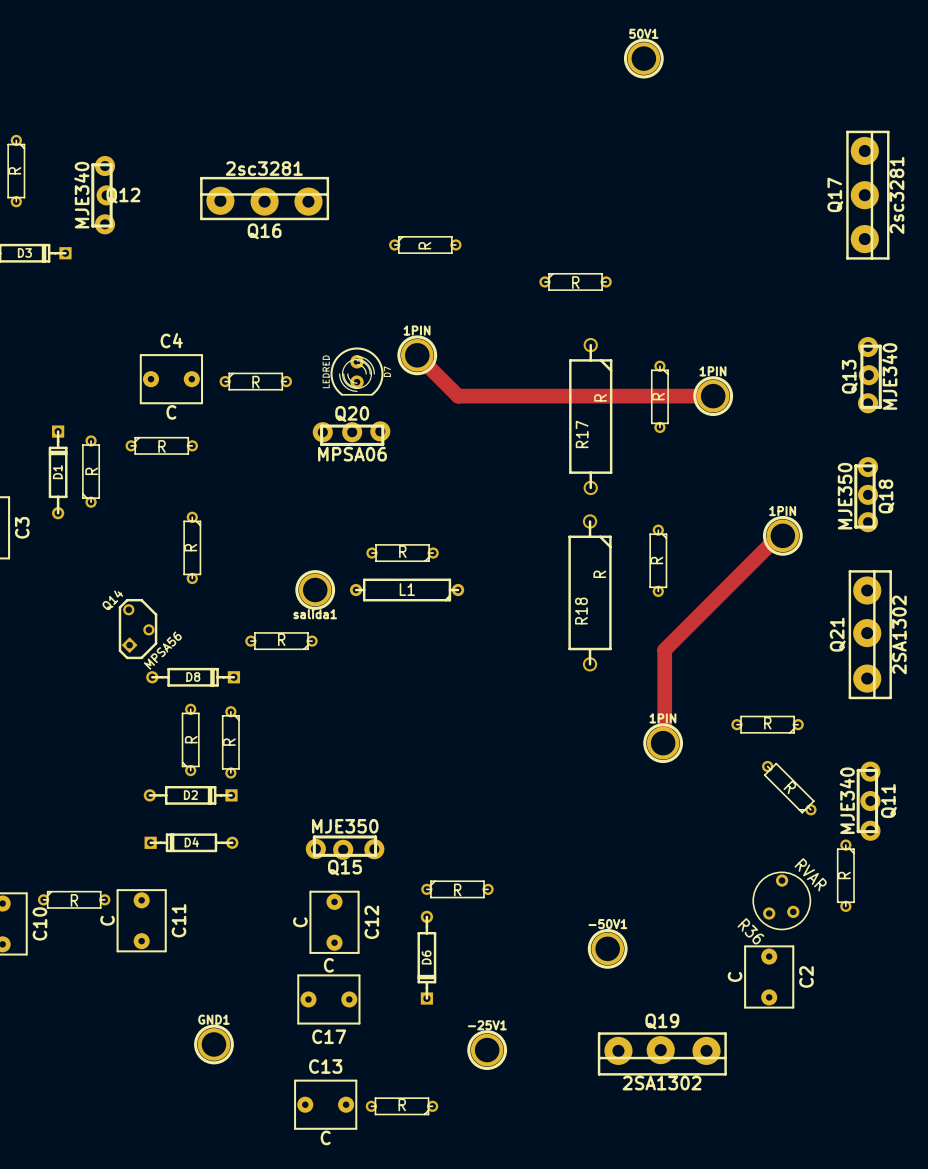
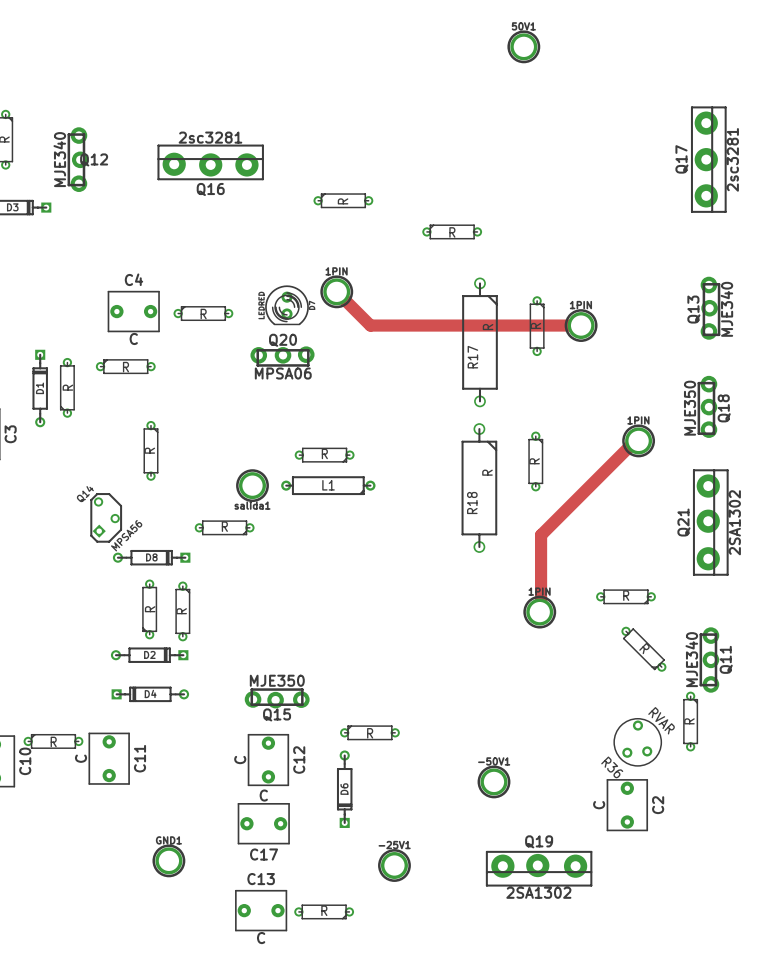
part position: (575, 281) -> (452, 231)

